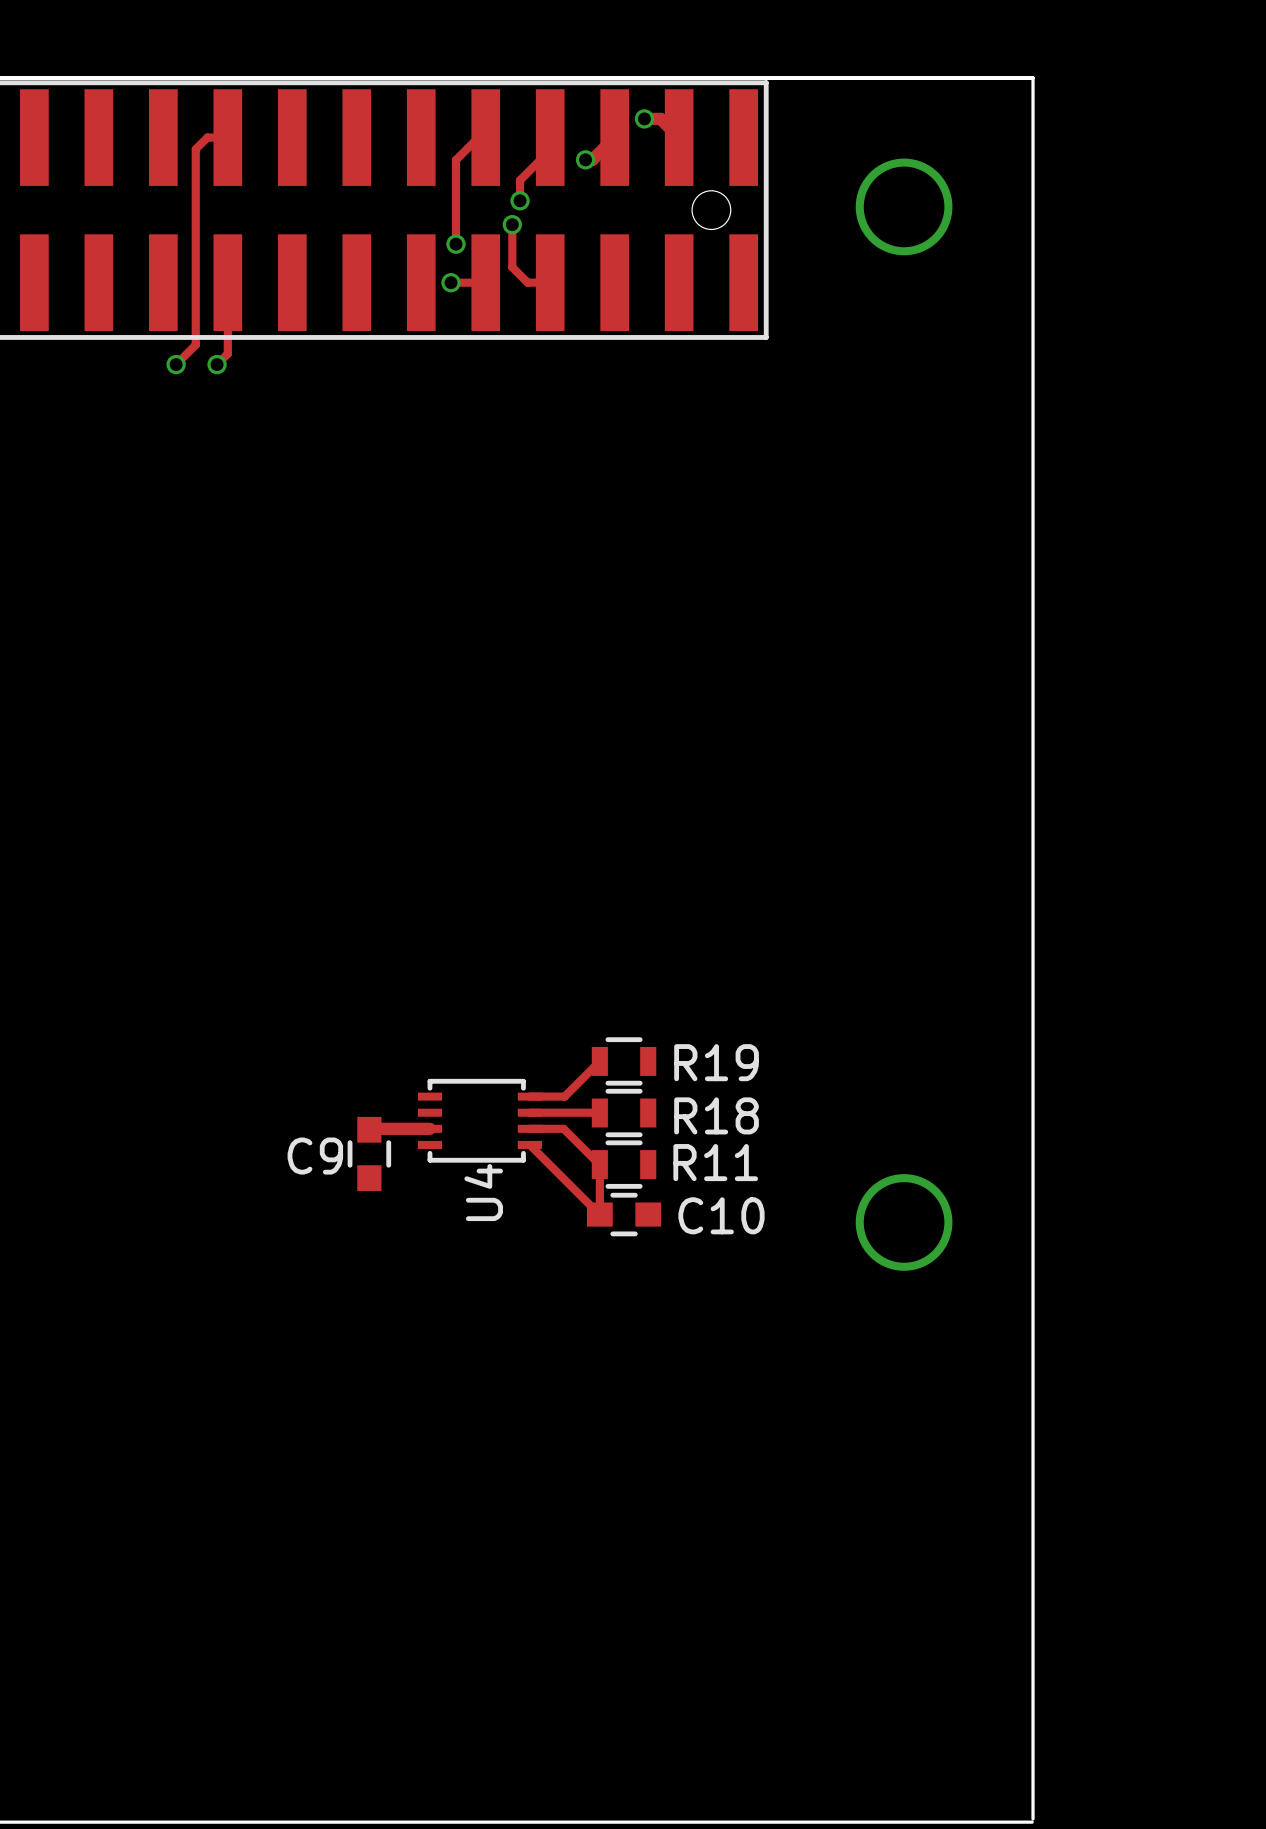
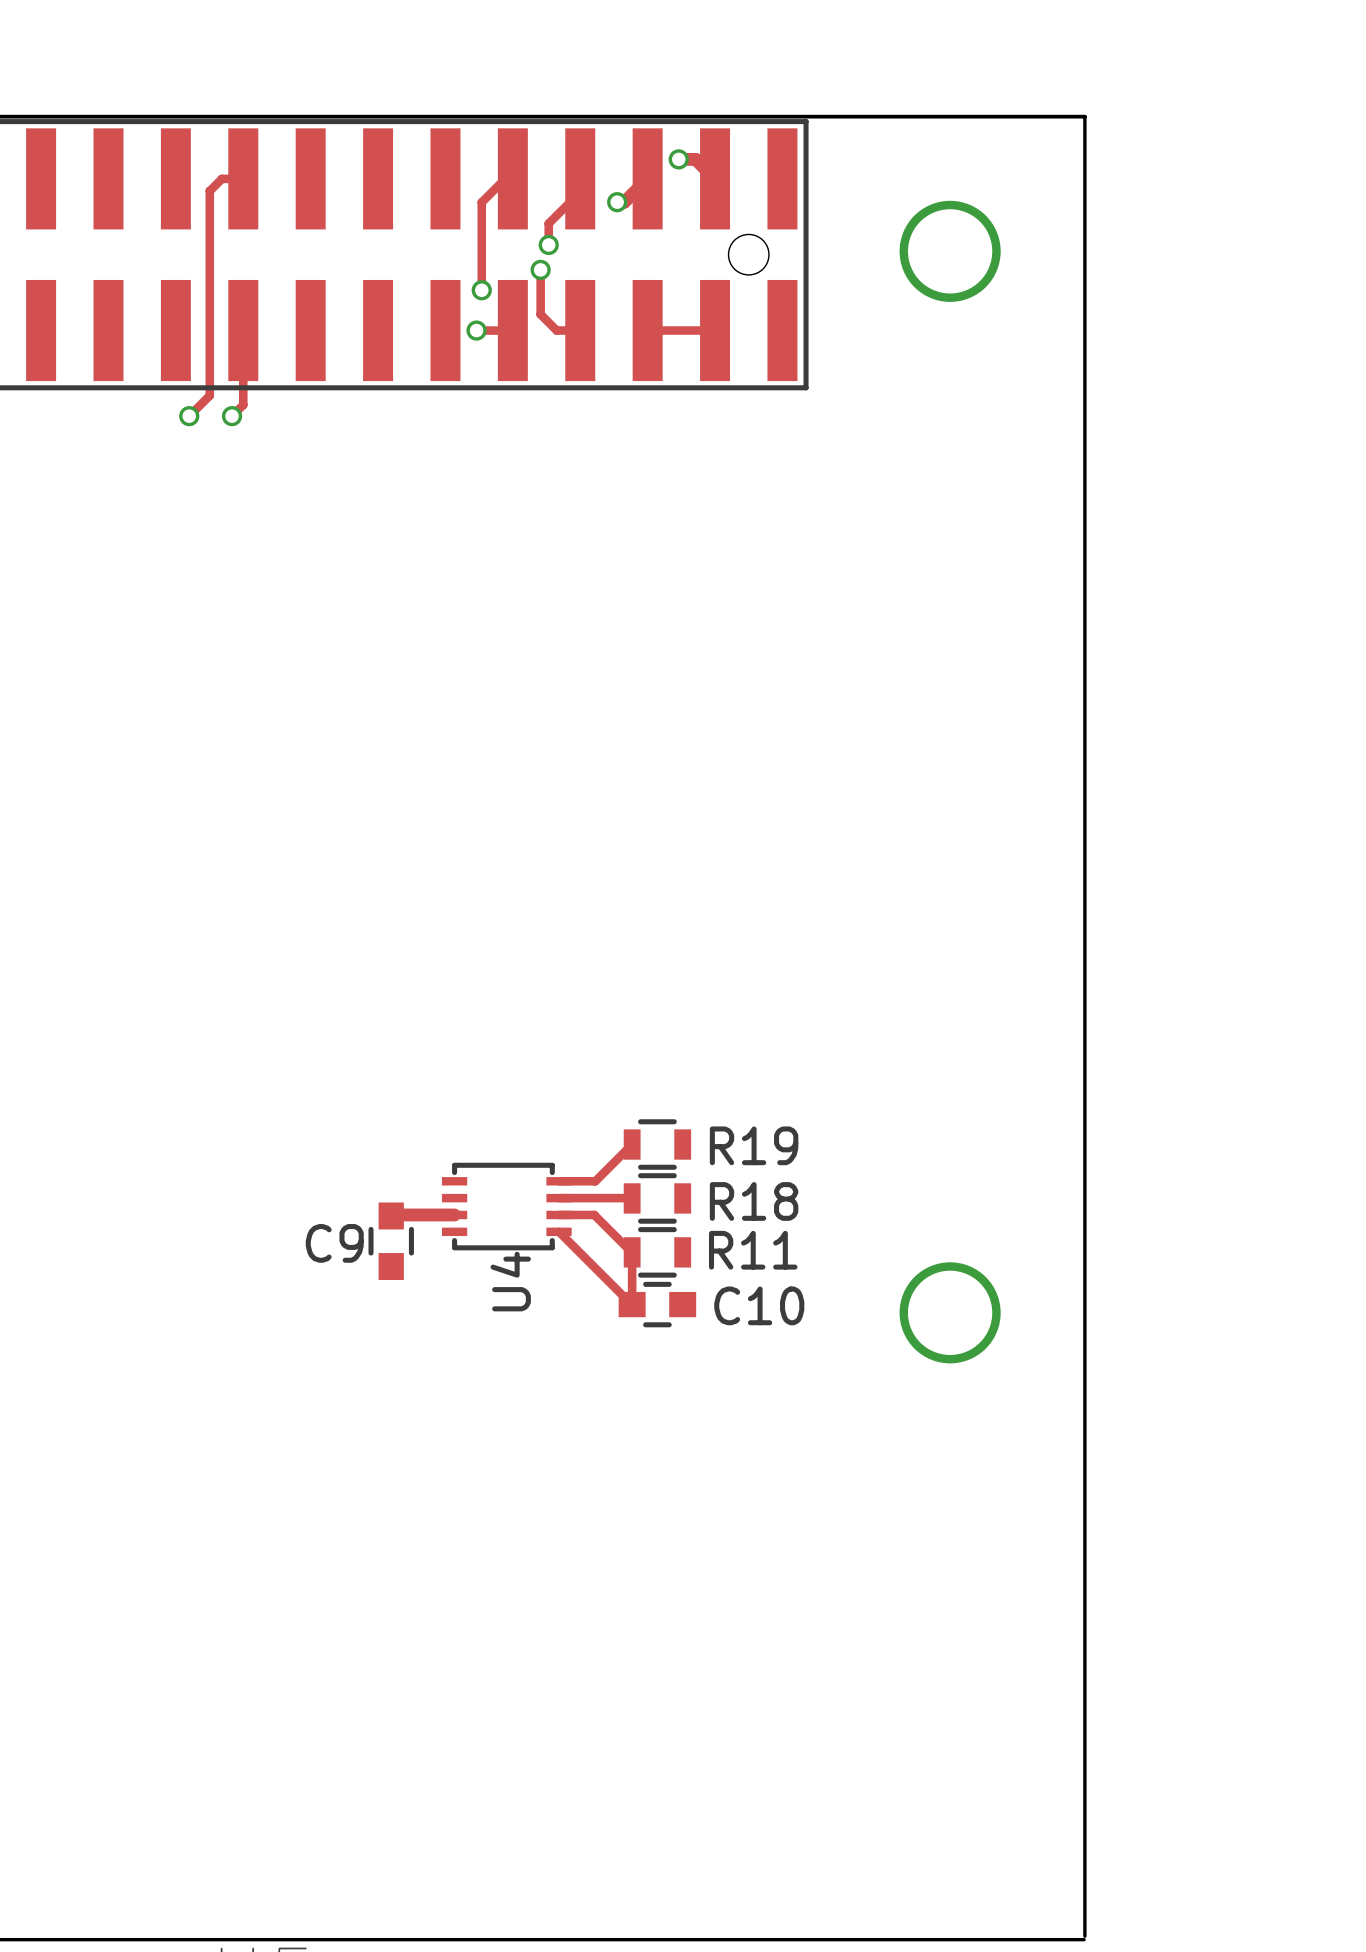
track: none -> (647, 330) (715, 330)

